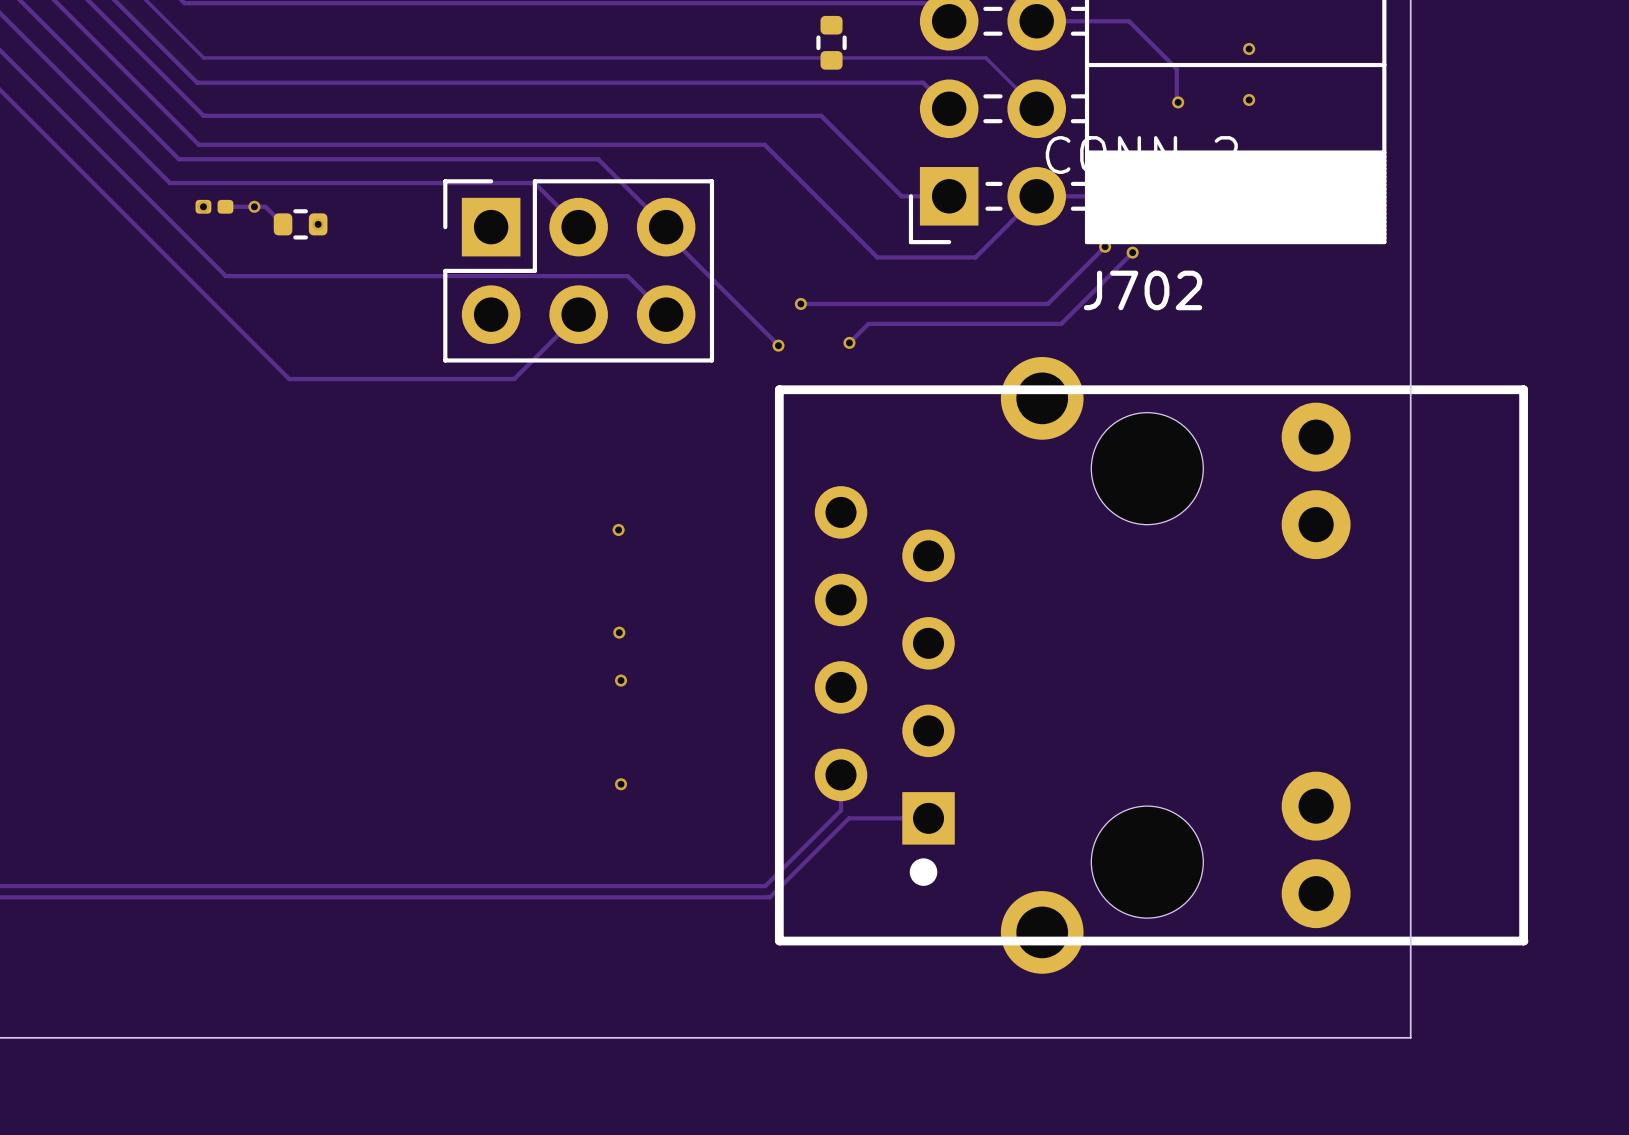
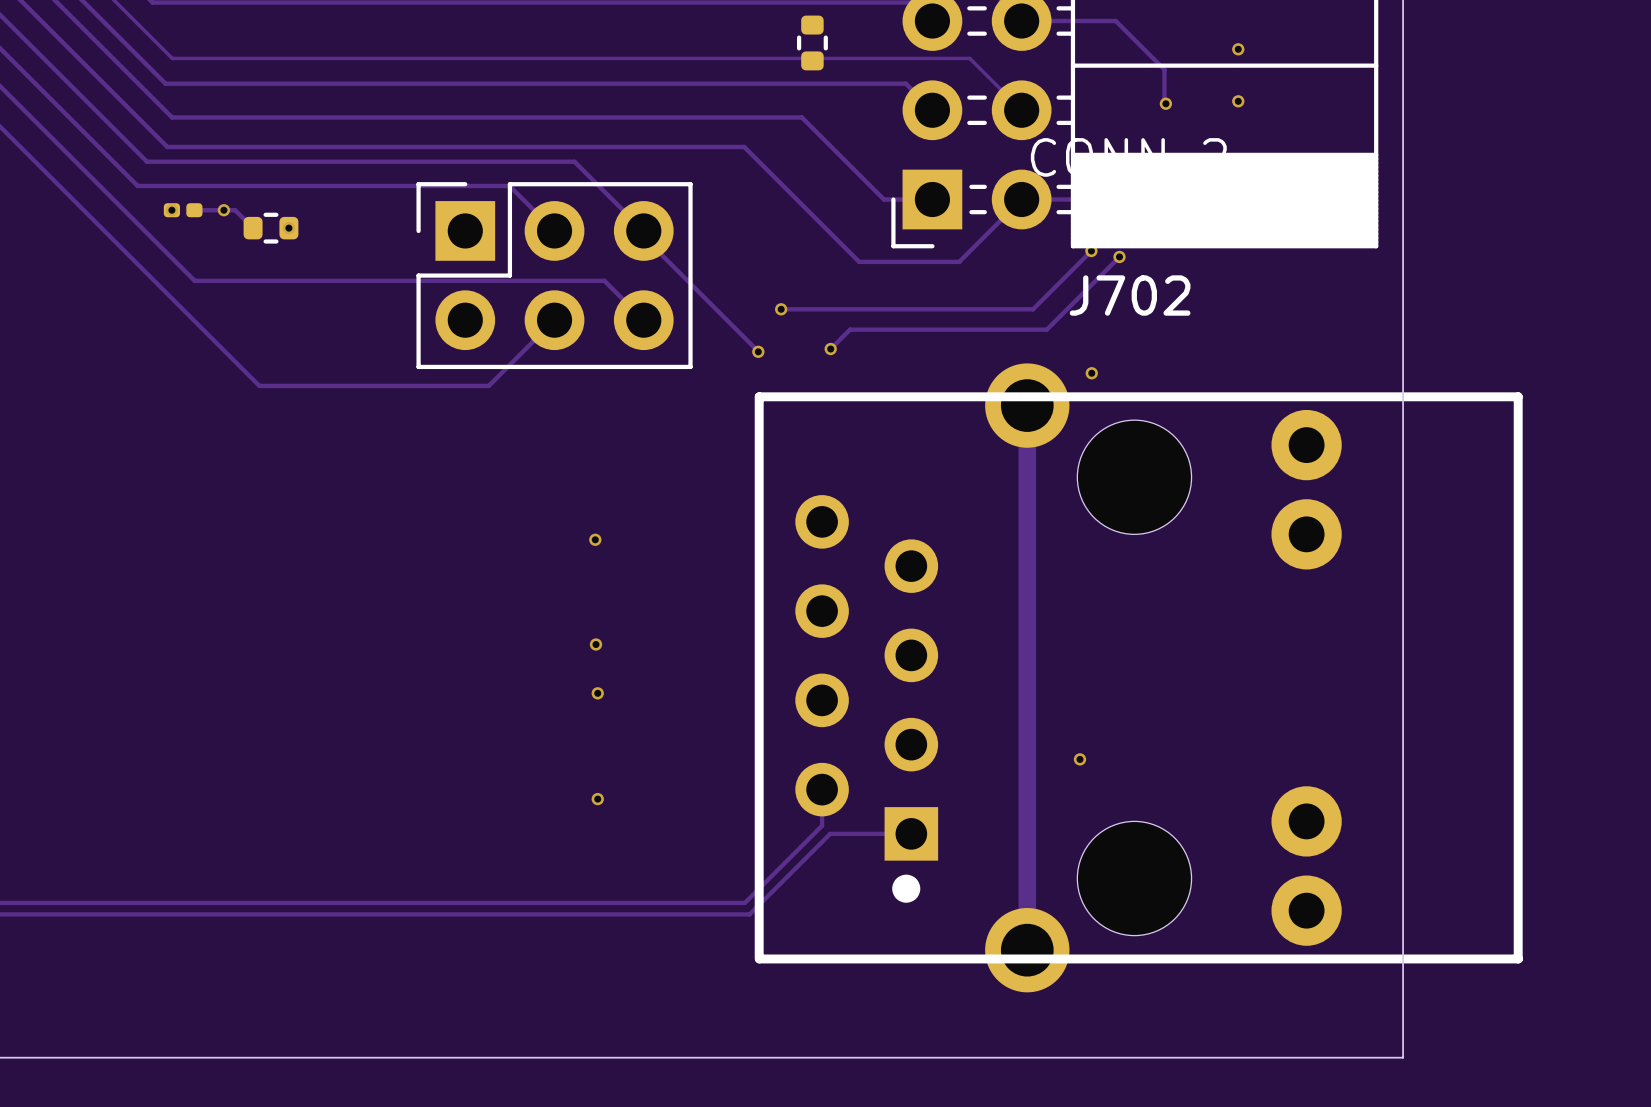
via: none -> (1091, 373)
track: none -> (1027, 405) (1027, 950)
via: none -> (1079, 759)

